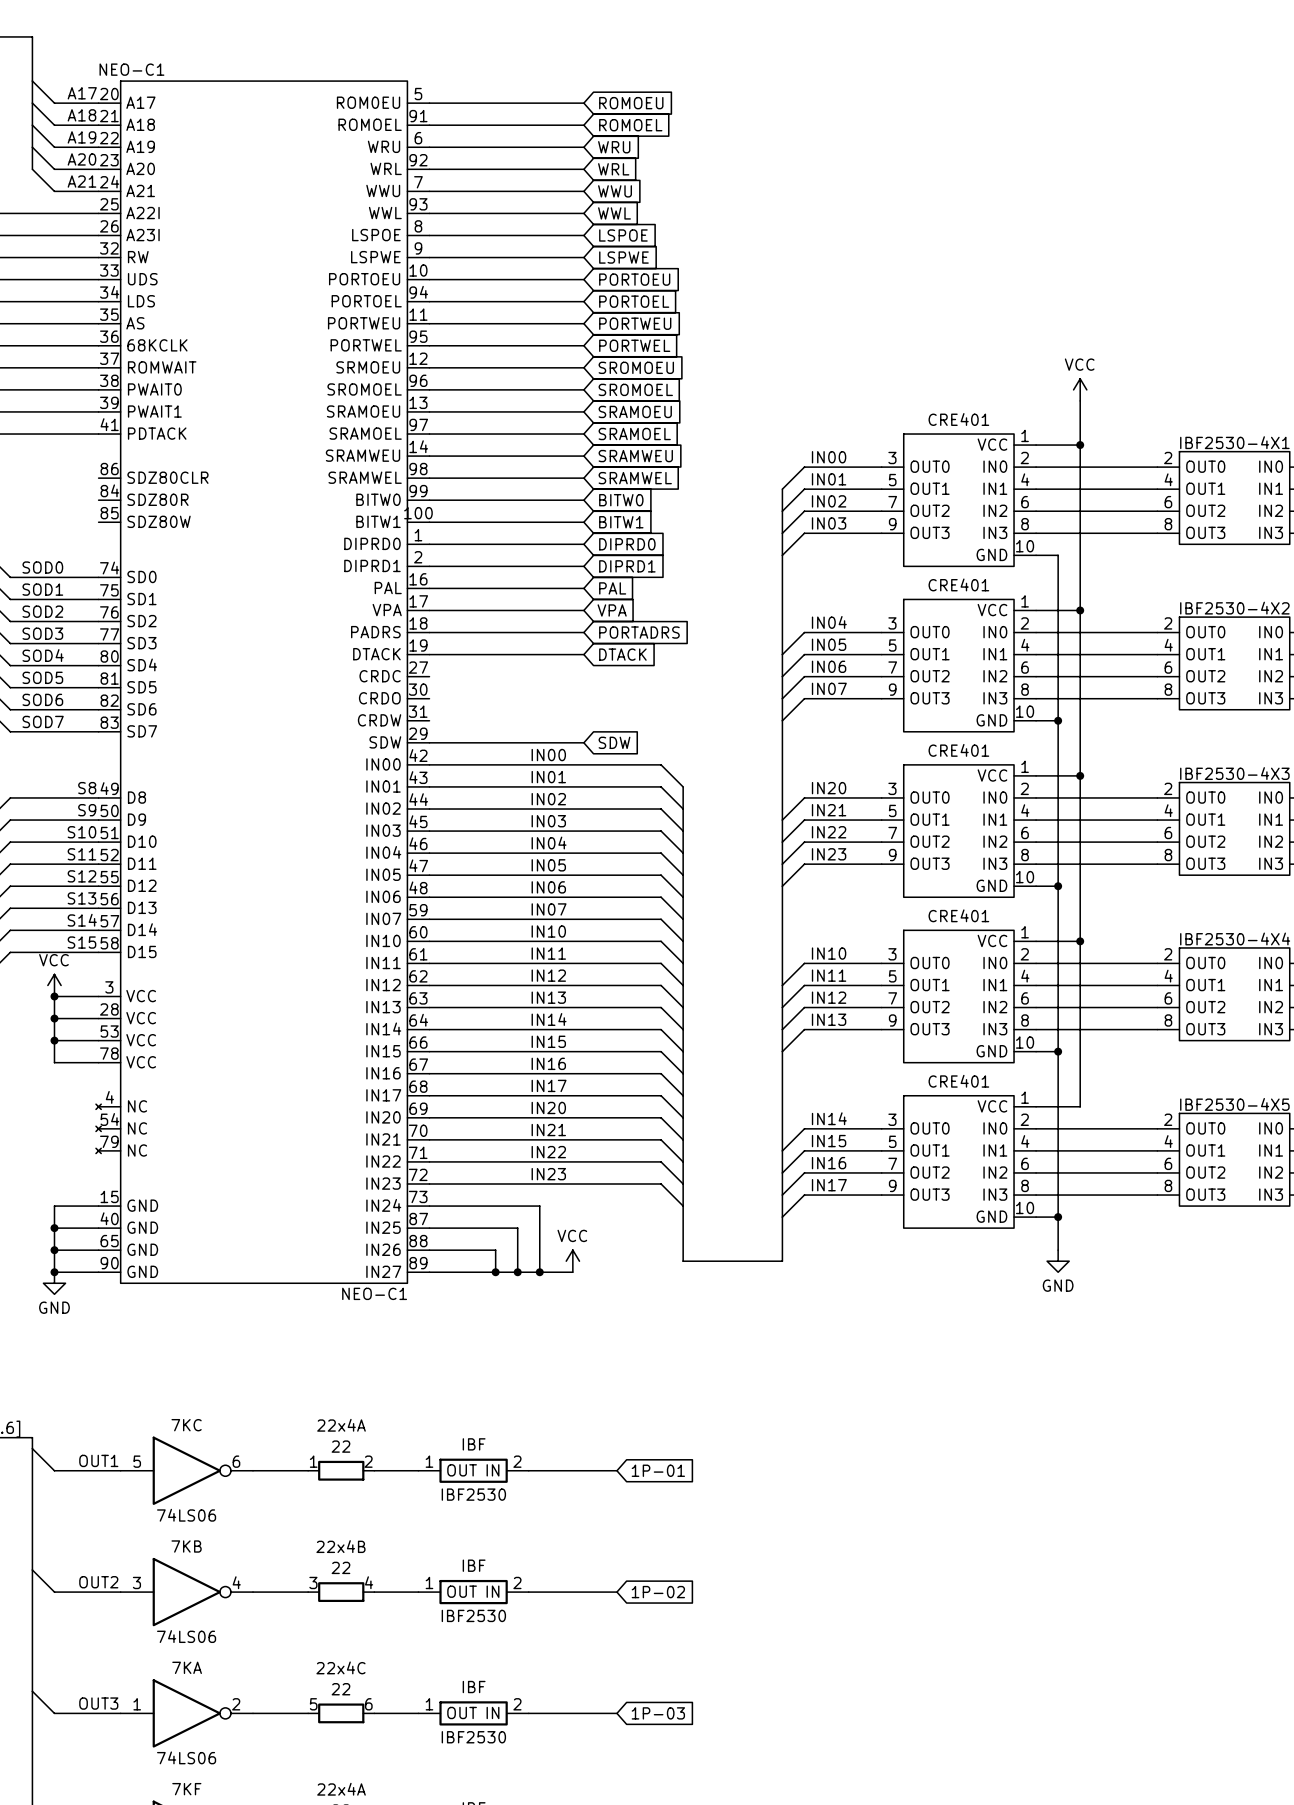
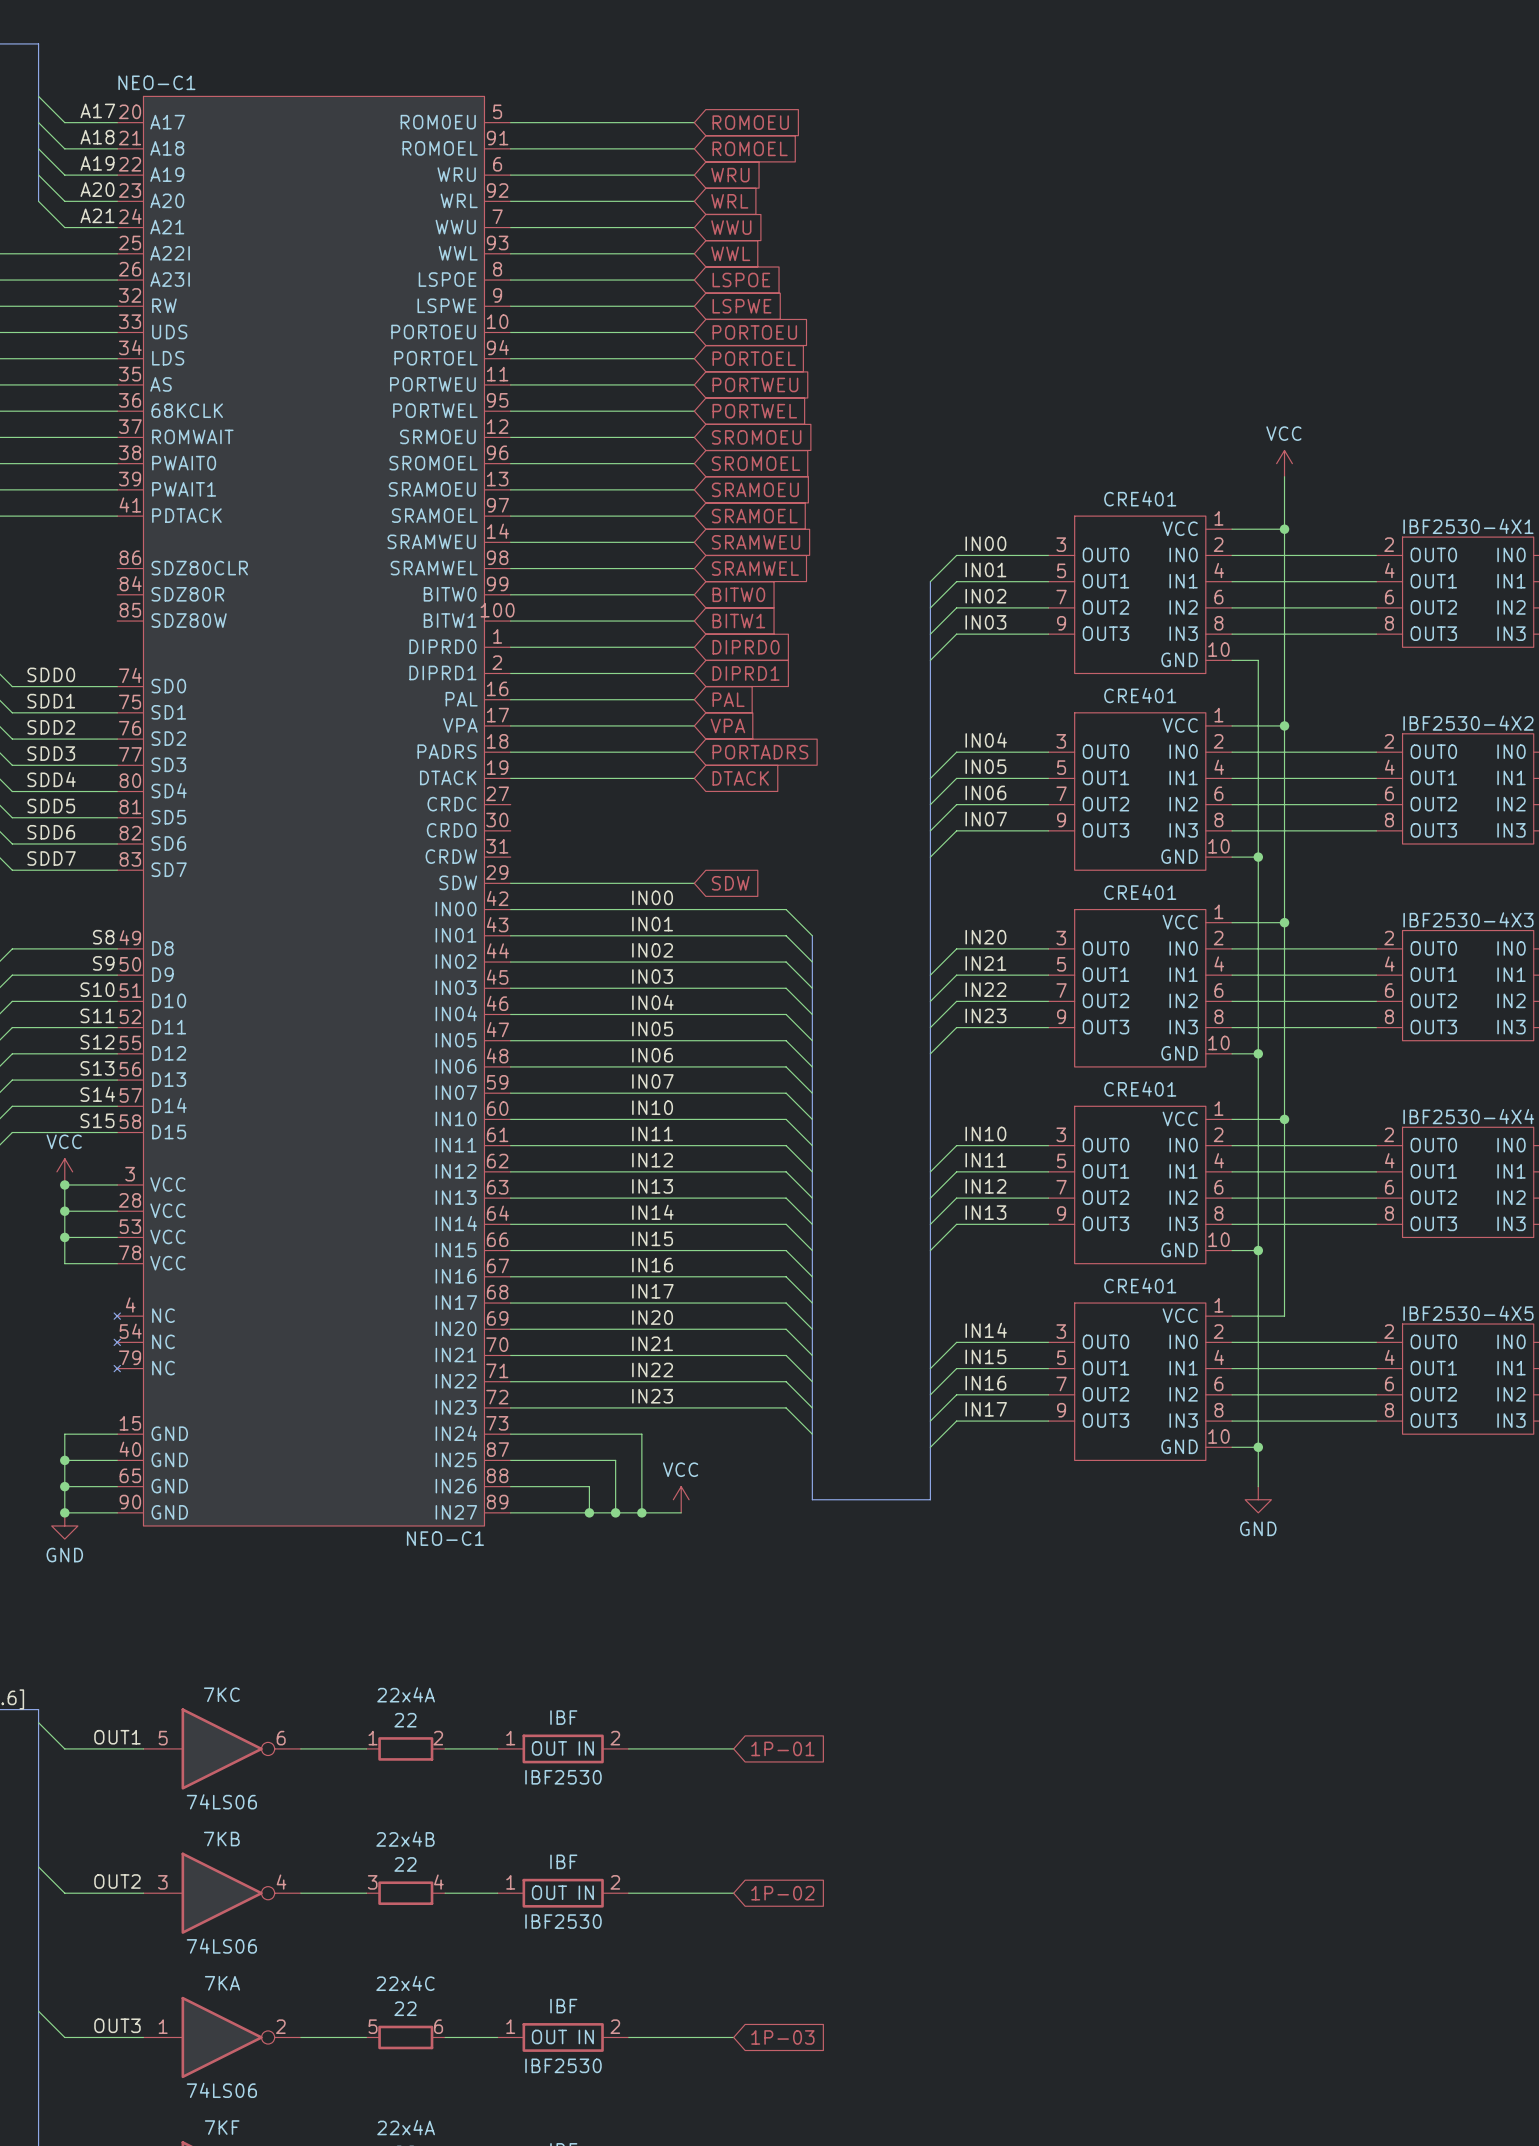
label: SOD0 (42, 567) -> SDD0 (51, 674)
label: SOD1 (42, 589) -> SDD1 (51, 701)
label: SOD2 (42, 611) -> SDD2 (51, 727)
label: SOD3 (42, 633) -> SDD3 (51, 753)
label: SOD4 (43, 655) -> SDD4 (51, 779)
label: SOD5 (42, 677) -> SDD5 (51, 806)
label: SOD6 (42, 699) -> SDD6 (51, 832)
label: SOD7 (43, 721) -> SDD7 (51, 858)

